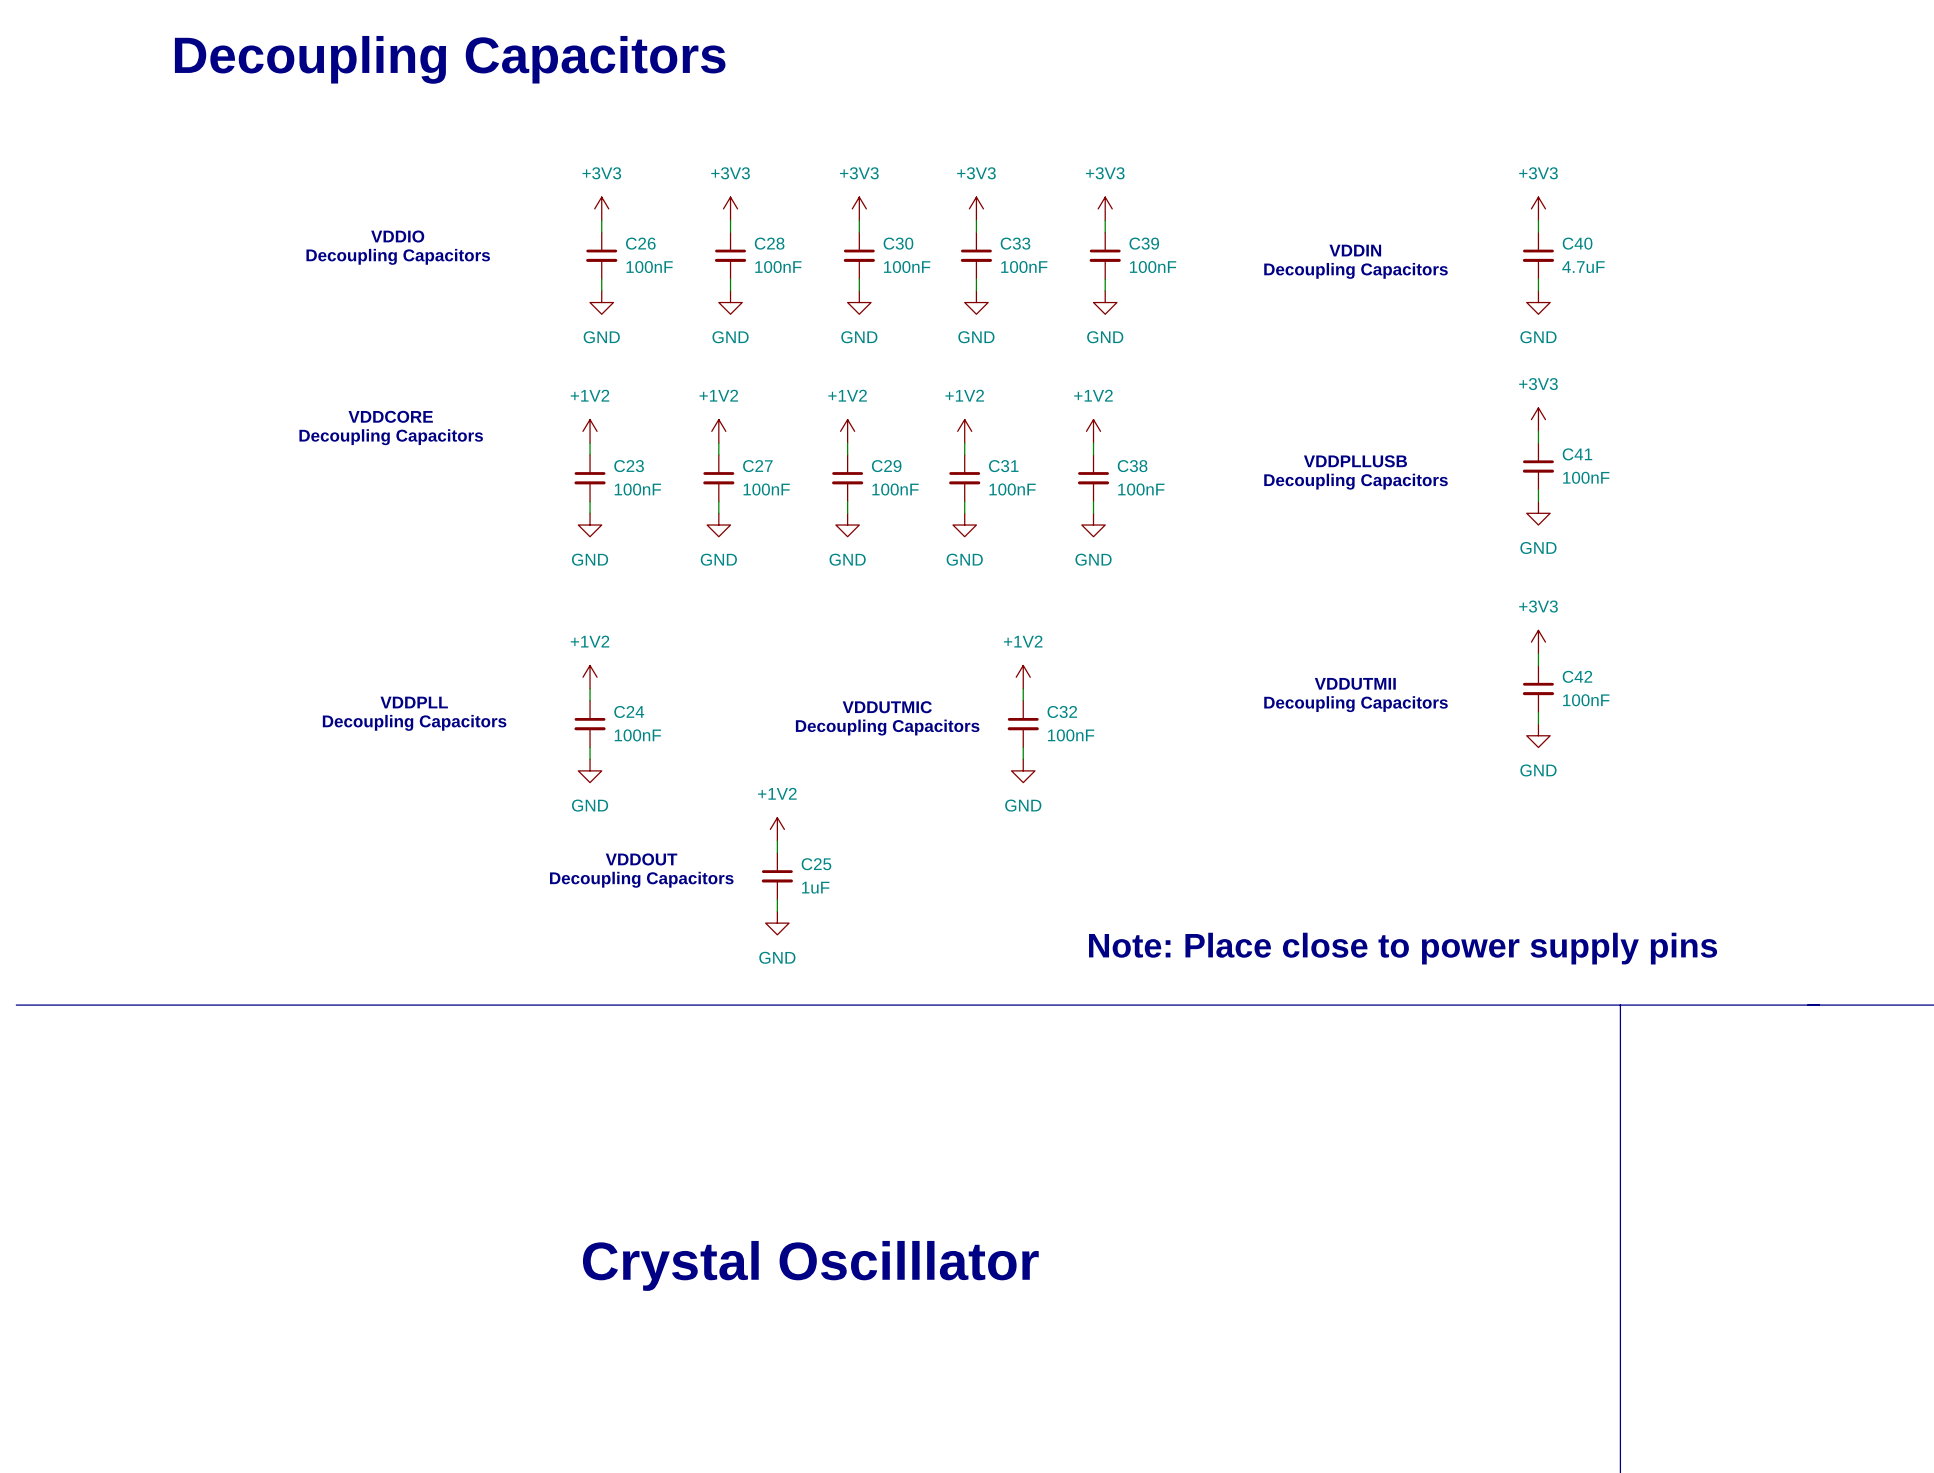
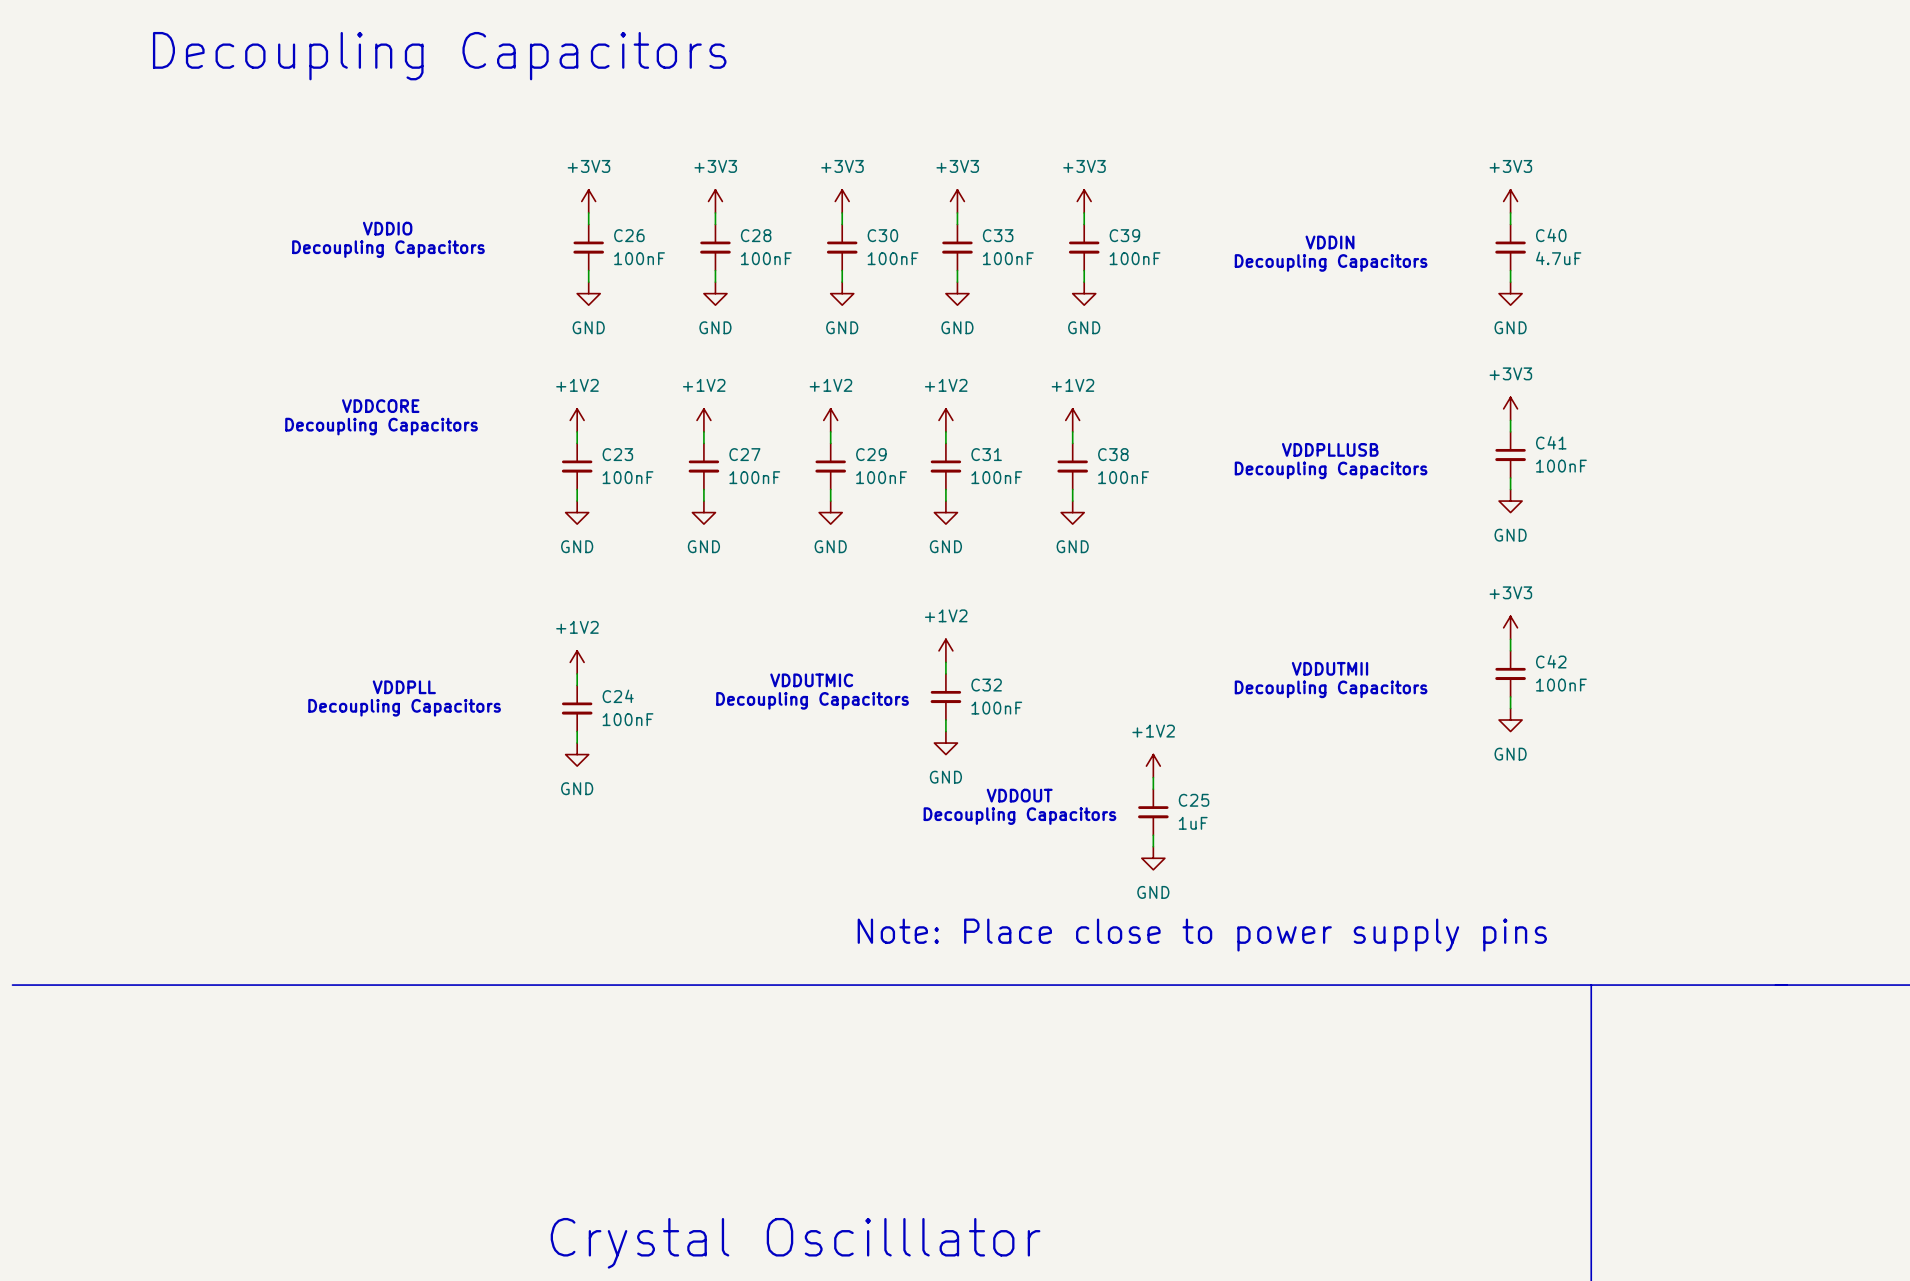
power symbol position: +1V2 (1023, 677) -> +1V2 (945, 650)
wire: (1023, 688) (1023, 700) -> (945, 662) (945, 673)
text position: VDDUTMIC (887, 707) -> VDDUTMIC (811, 680)
C32 position: (1023, 724) -> (945, 696)
text position: Decoupling Capacitors (887, 727) -> Decoupling Capacitors (812, 700)
wire: (1023, 747) (1023, 759) -> (945, 720) (945, 731)
power symbol position: GND (1023, 770) -> GND (945, 743)
power symbol: none -> +1V2 (1153, 766)
wire: none -> (1153, 777) (1153, 789)
text: none -> VDDOUT (1019, 795)
power symbol: +1V2 (777, 829) -> none
text: none -> Decoupling Capacitors (1019, 816)
wire: (777, 841) (777, 852) -> none
wire: none -> (1153, 835) (1153, 846)
text: VDDOUT (641, 859) -> none
C25 position: (777, 876) -> (1153, 812)
power symbol: none -> GND (1153, 858)
text: Decoupling Capacitors (641, 879) -> none
wire: (777, 899) (777, 911) -> none
power symbol: GND (777, 923) -> none
text position: Note: Place close to power supply pins (1403, 948) -> Note: Place close to power supply pins (1202, 935)

